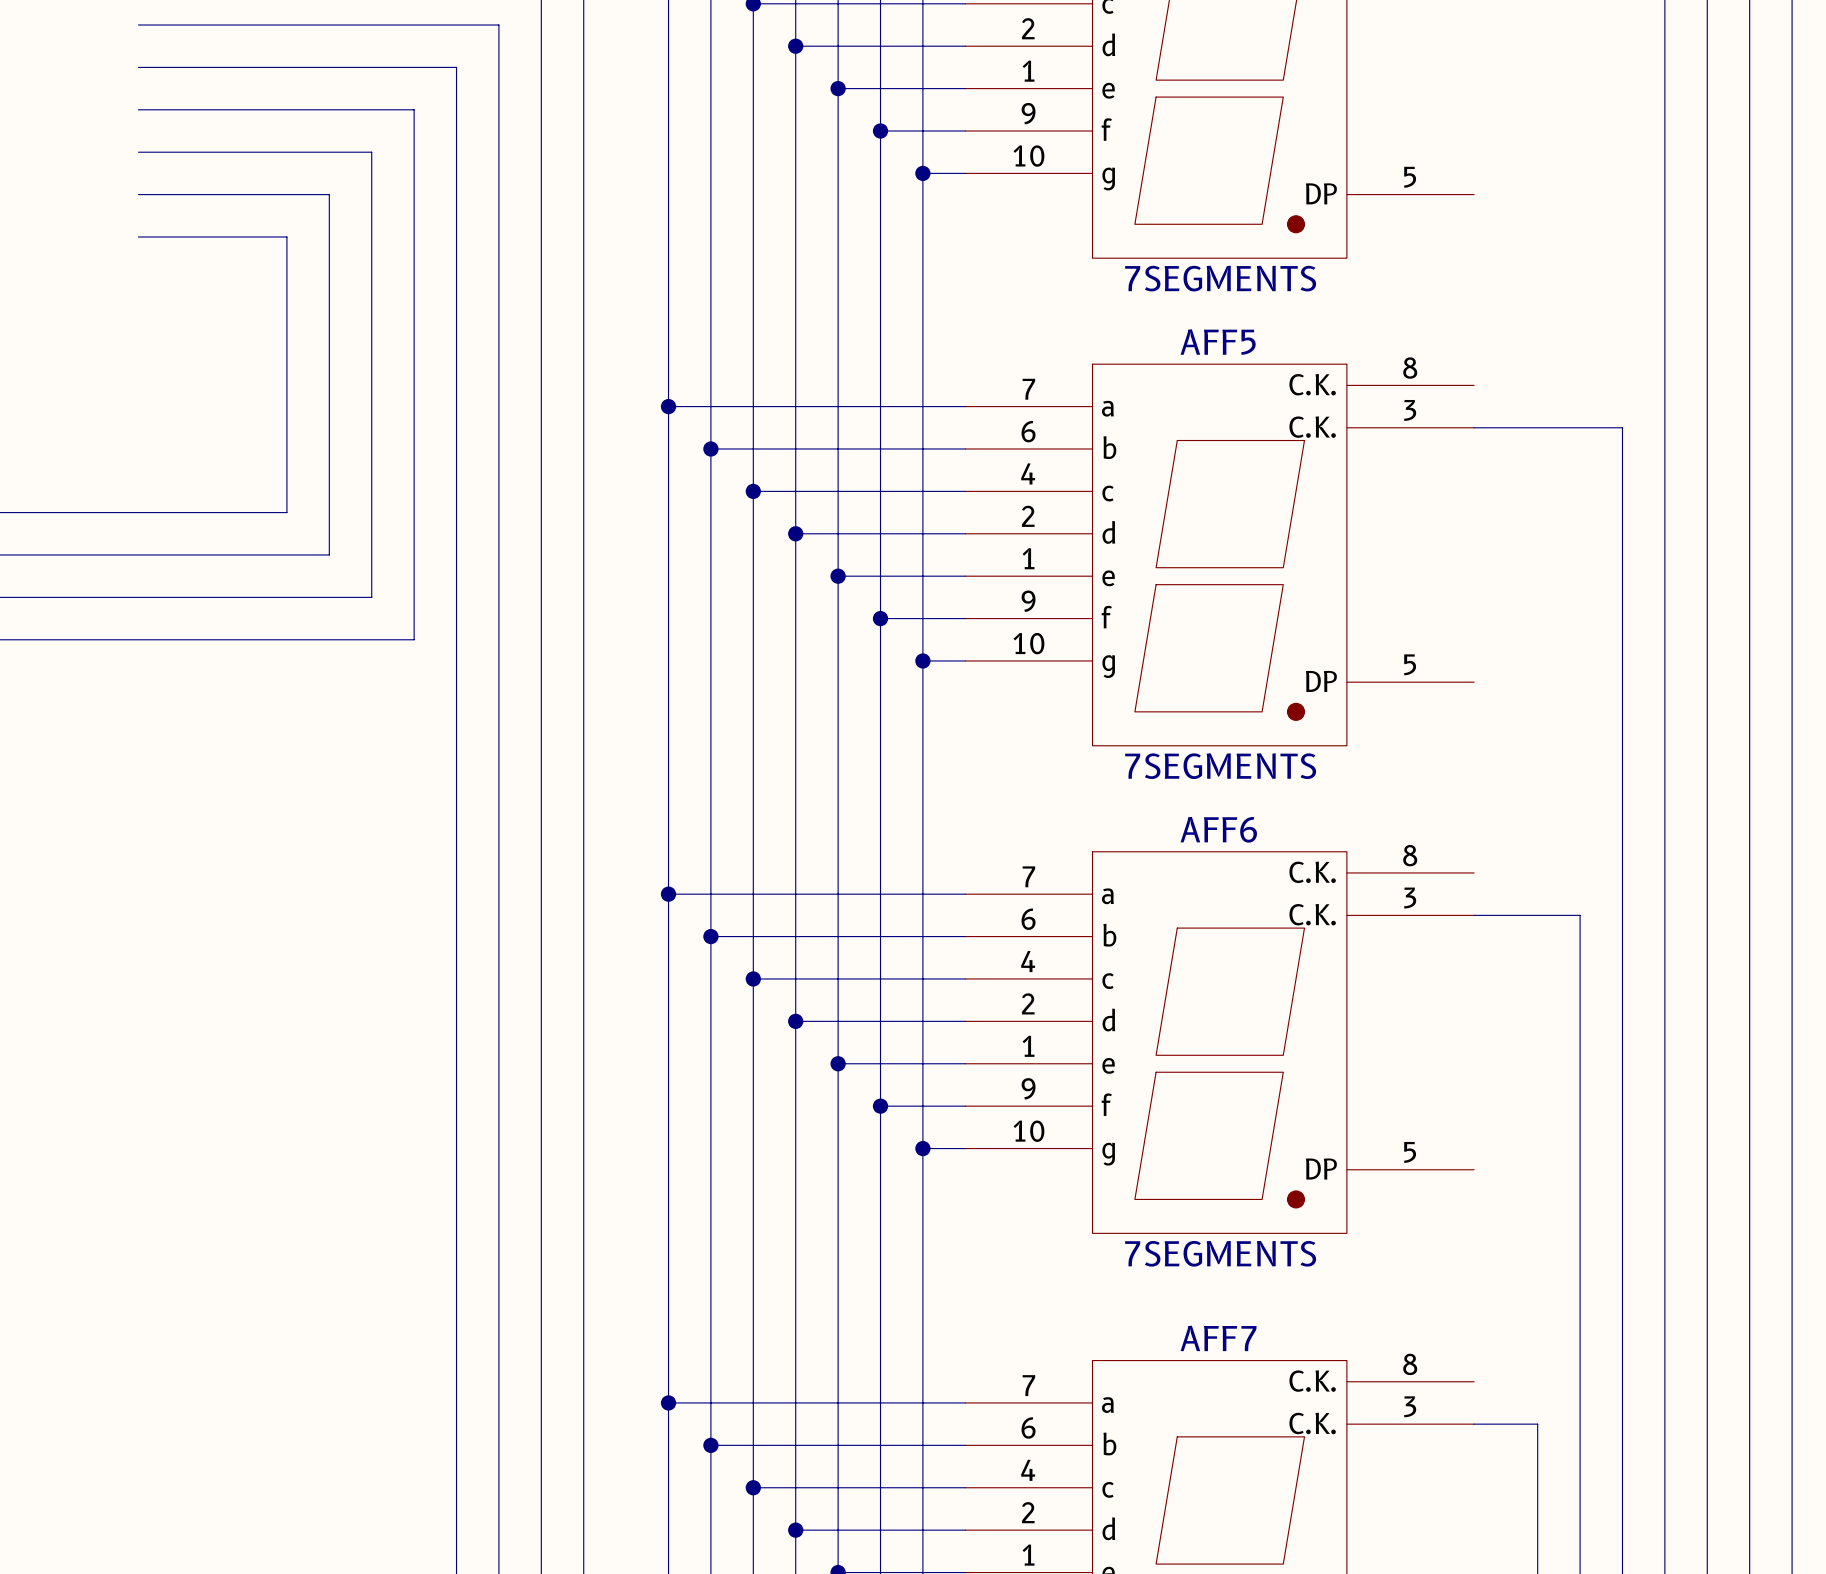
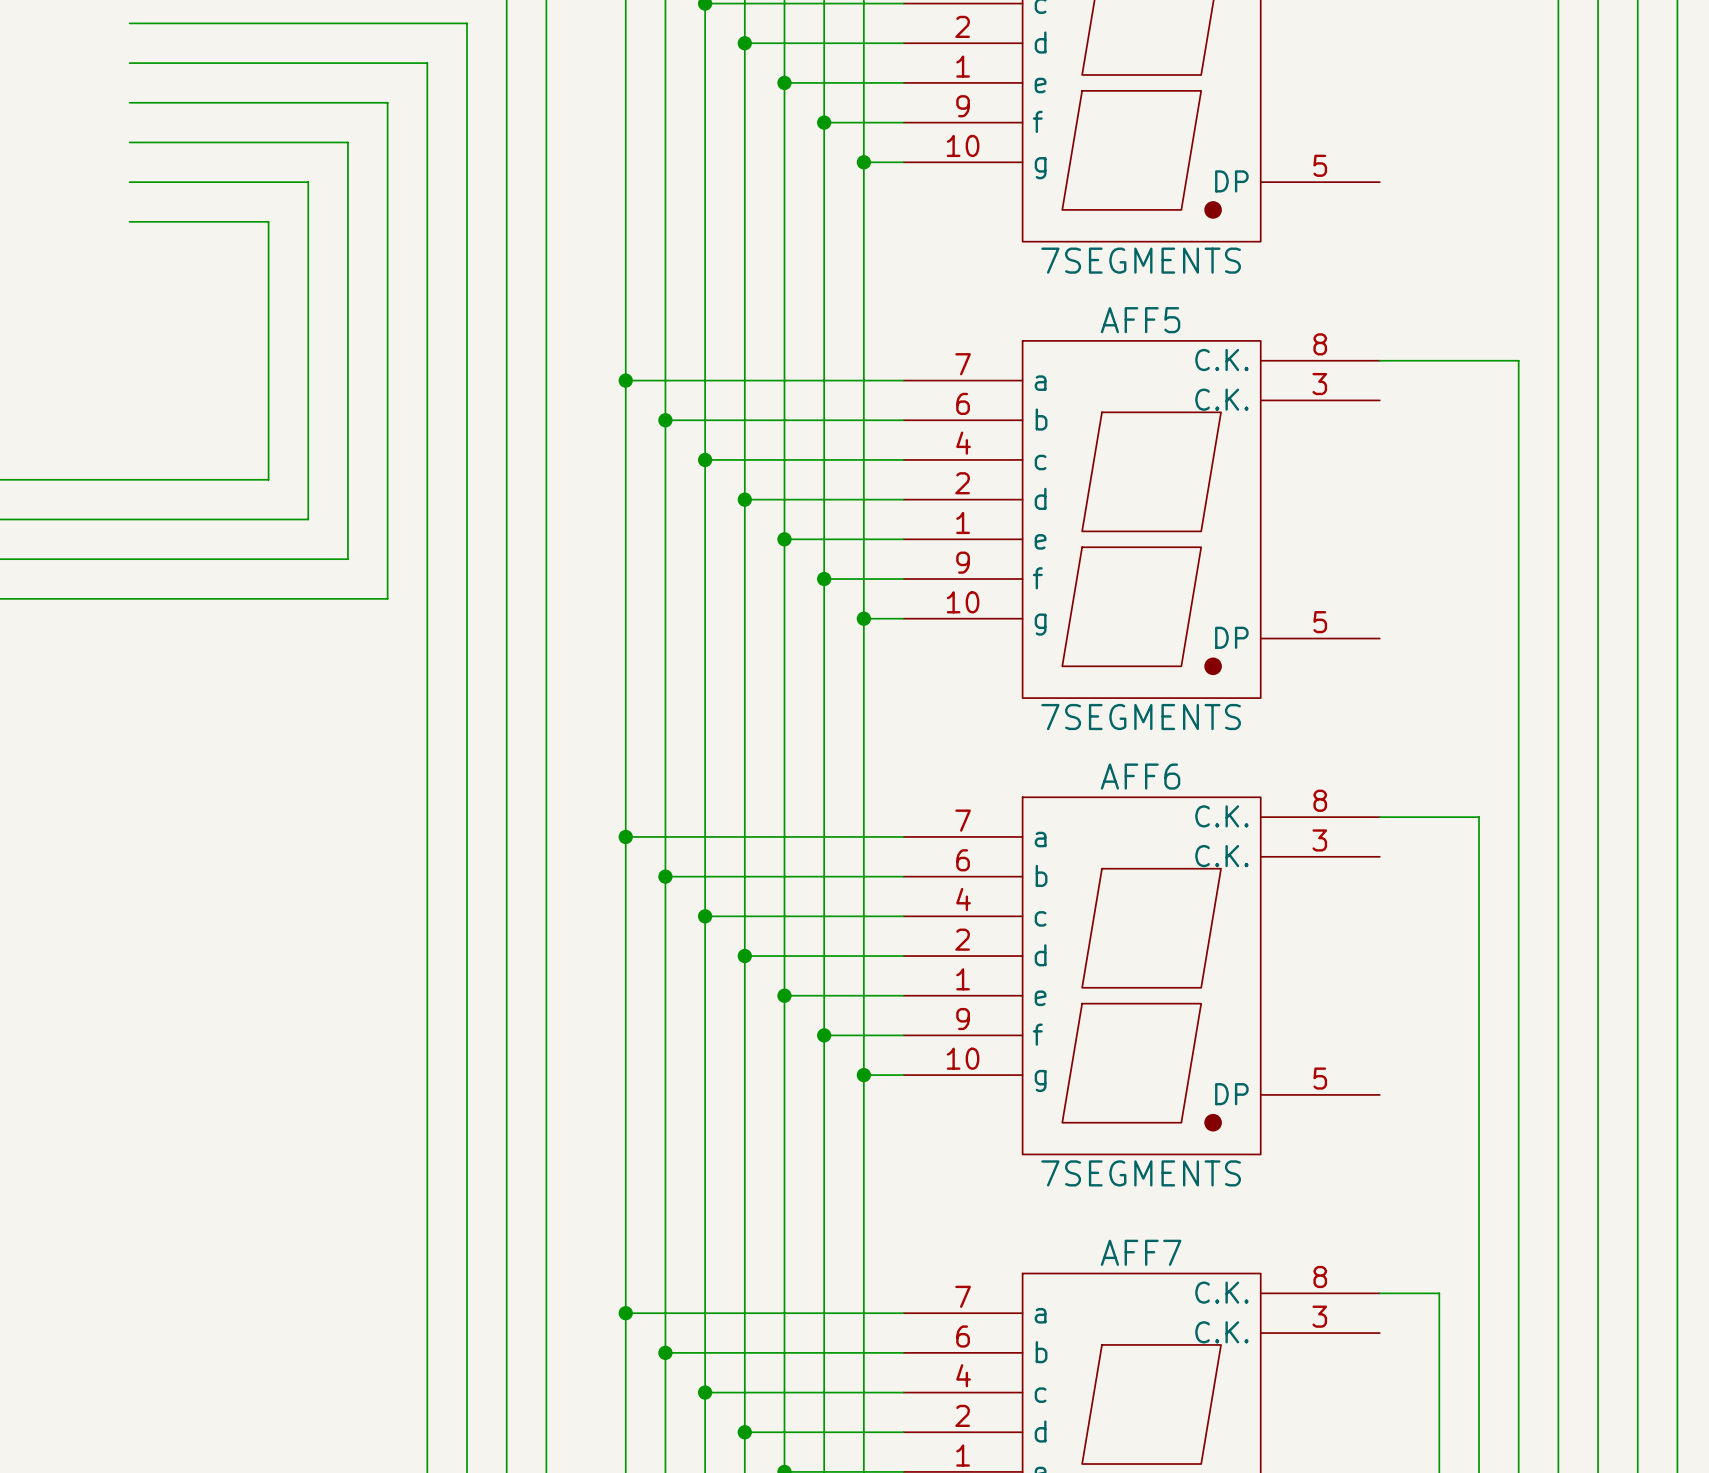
wire: (1474, 427) (1622, 427) -> (1379, 360) (1518, 360) (1518, 400)
wire: (1474, 915) (1580, 915) -> (1379, 817) (1478, 817) (1478, 856)
wire: (1474, 1424) (1537, 1424) -> (1379, 1293) (1439, 1293) (1439, 1333)

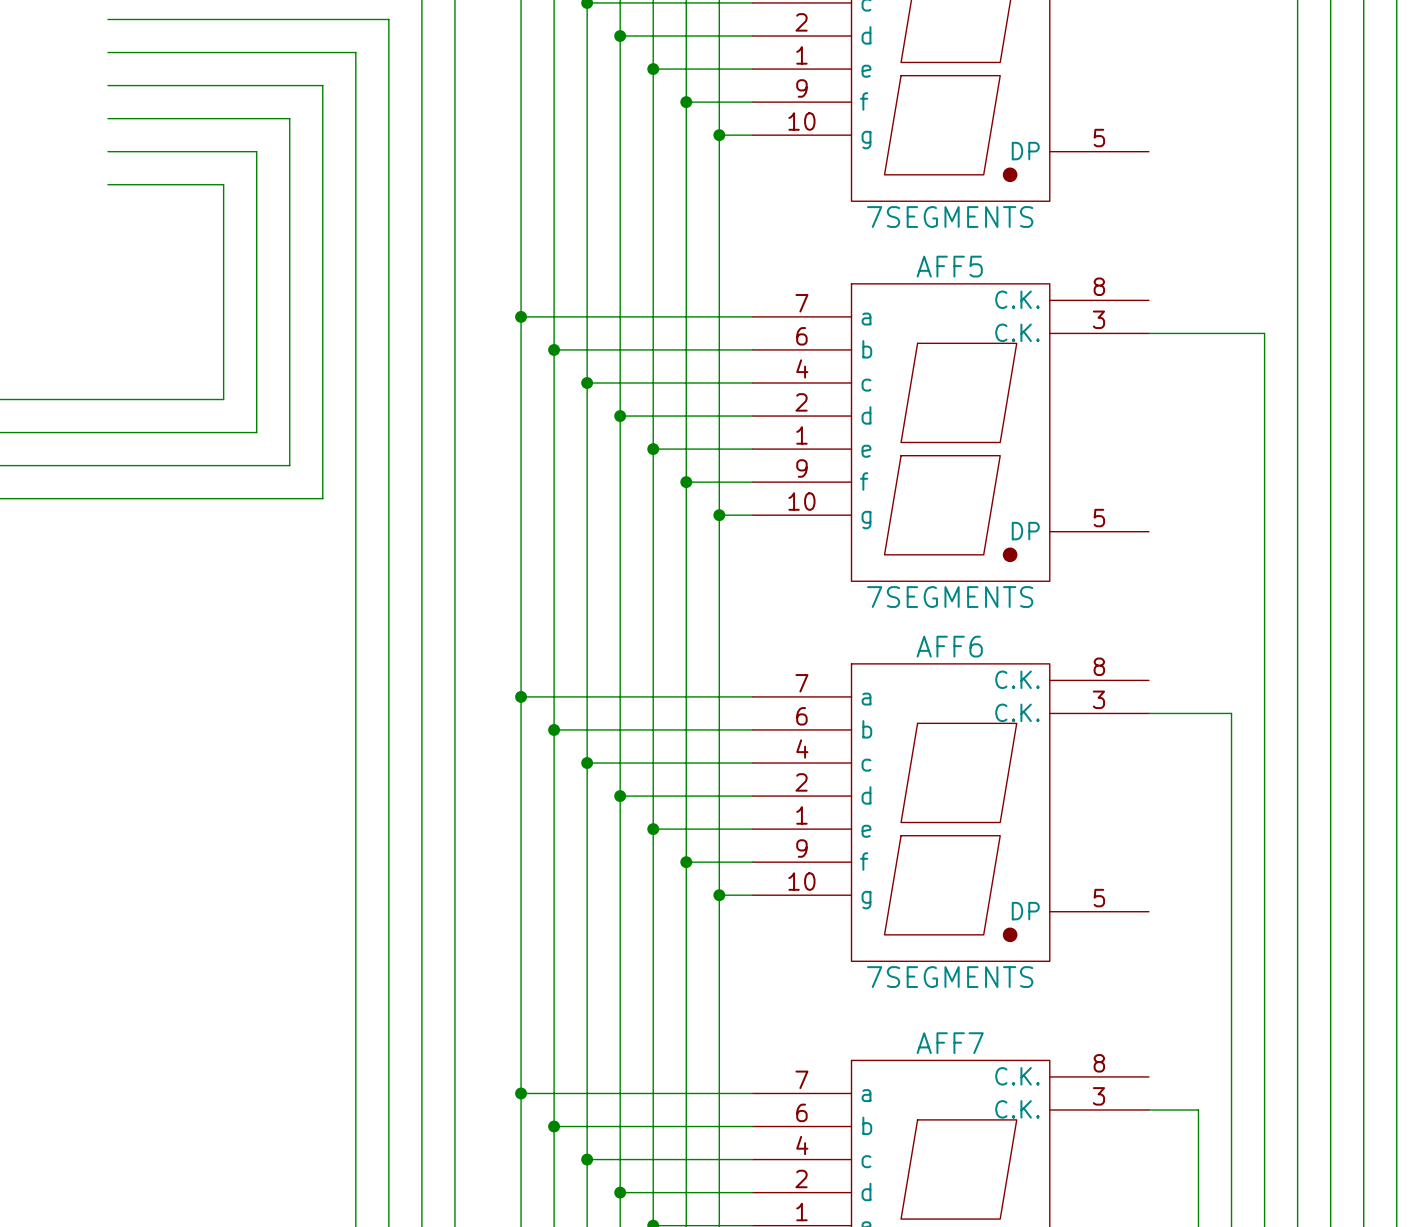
wire: (1379, 360) (1518, 360) (1518, 400) -> (1148, 333) (1264, 333)
wire: (1379, 817) (1478, 817) (1478, 856) -> (1148, 713) (1231, 713)
wire: (1379, 1293) (1439, 1293) (1439, 1333) -> (1148, 1109) (1198, 1109)

